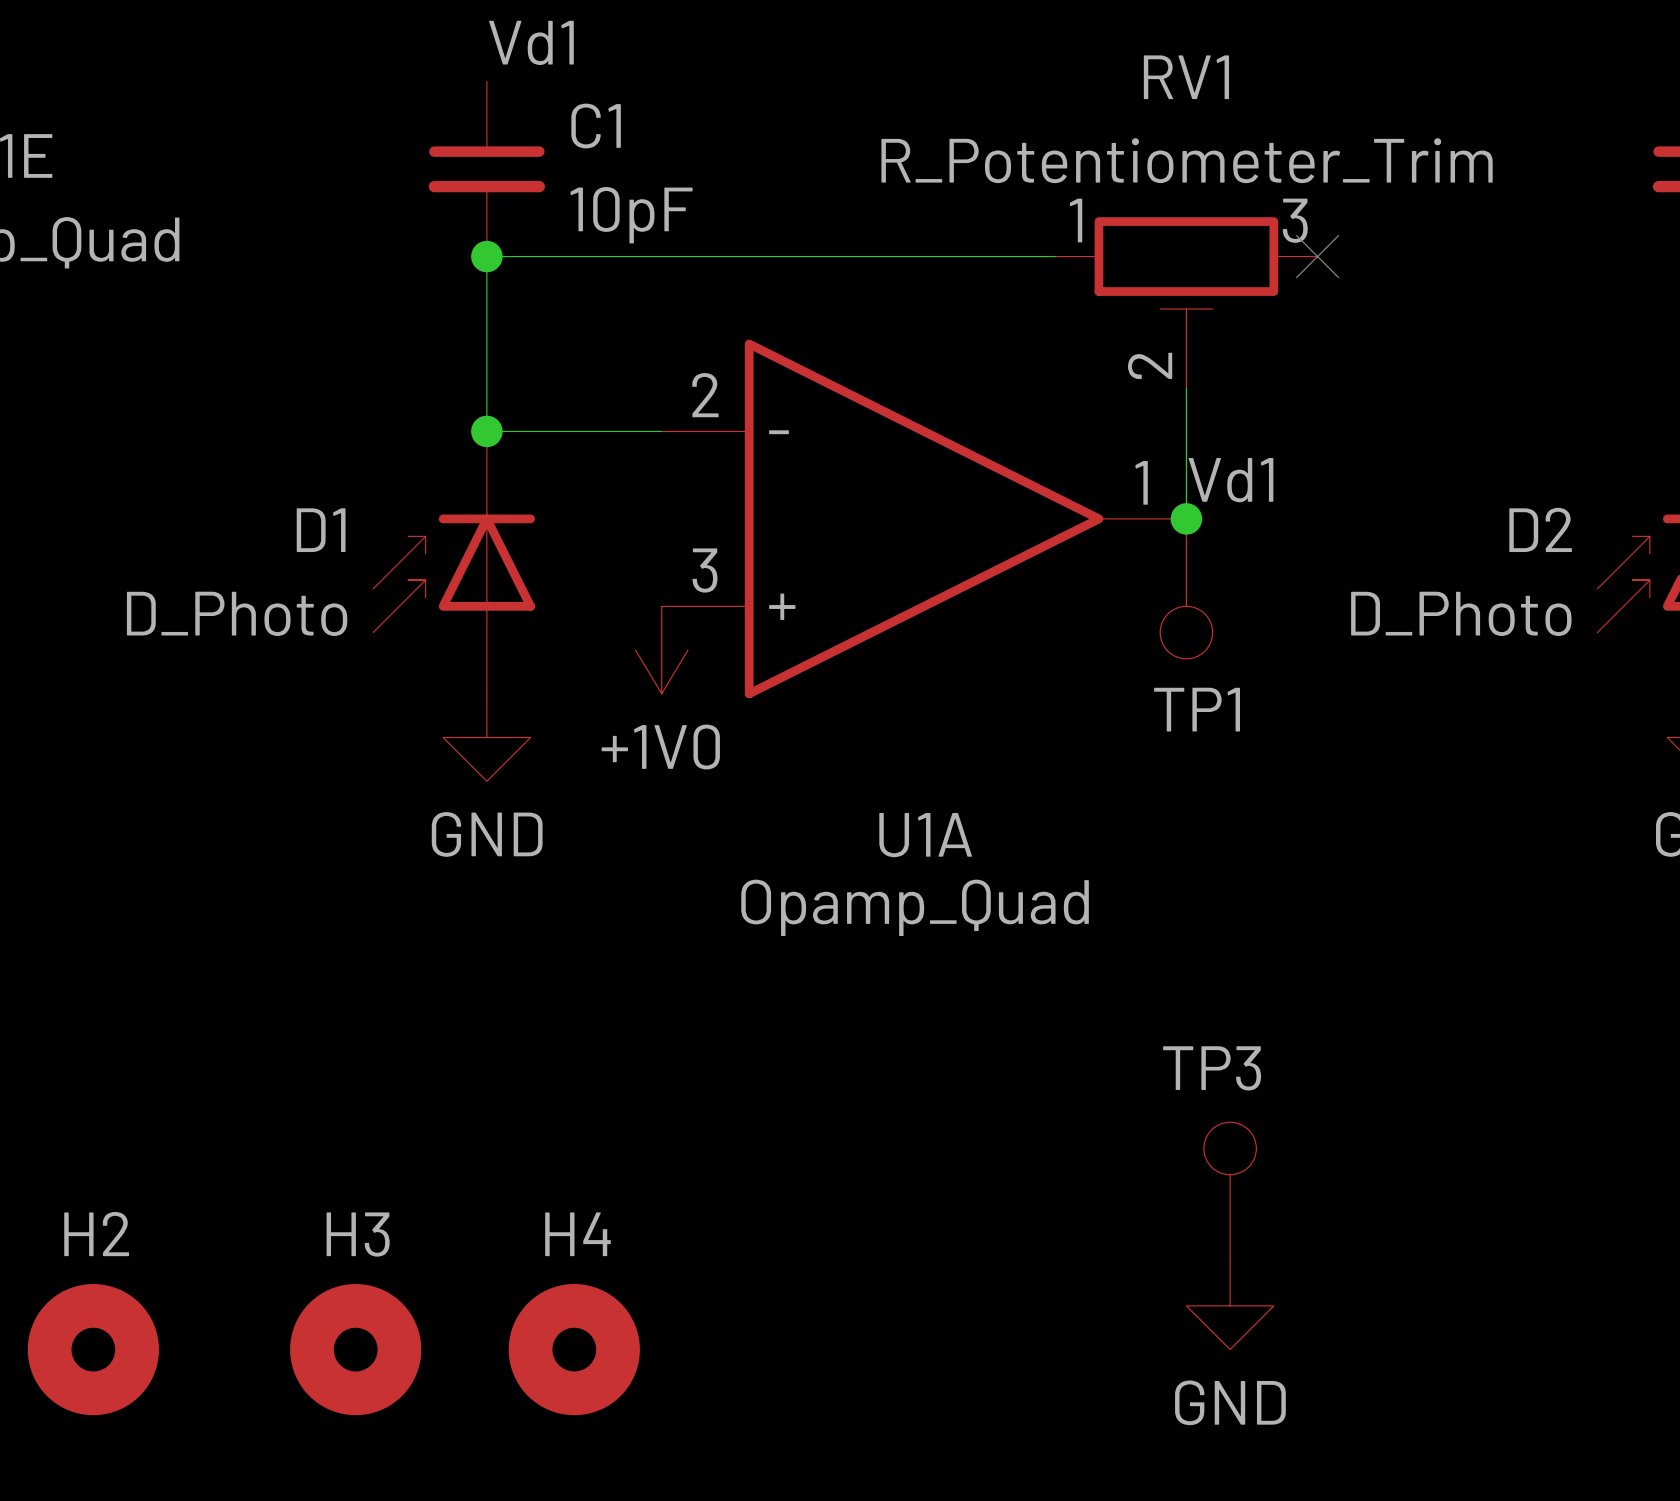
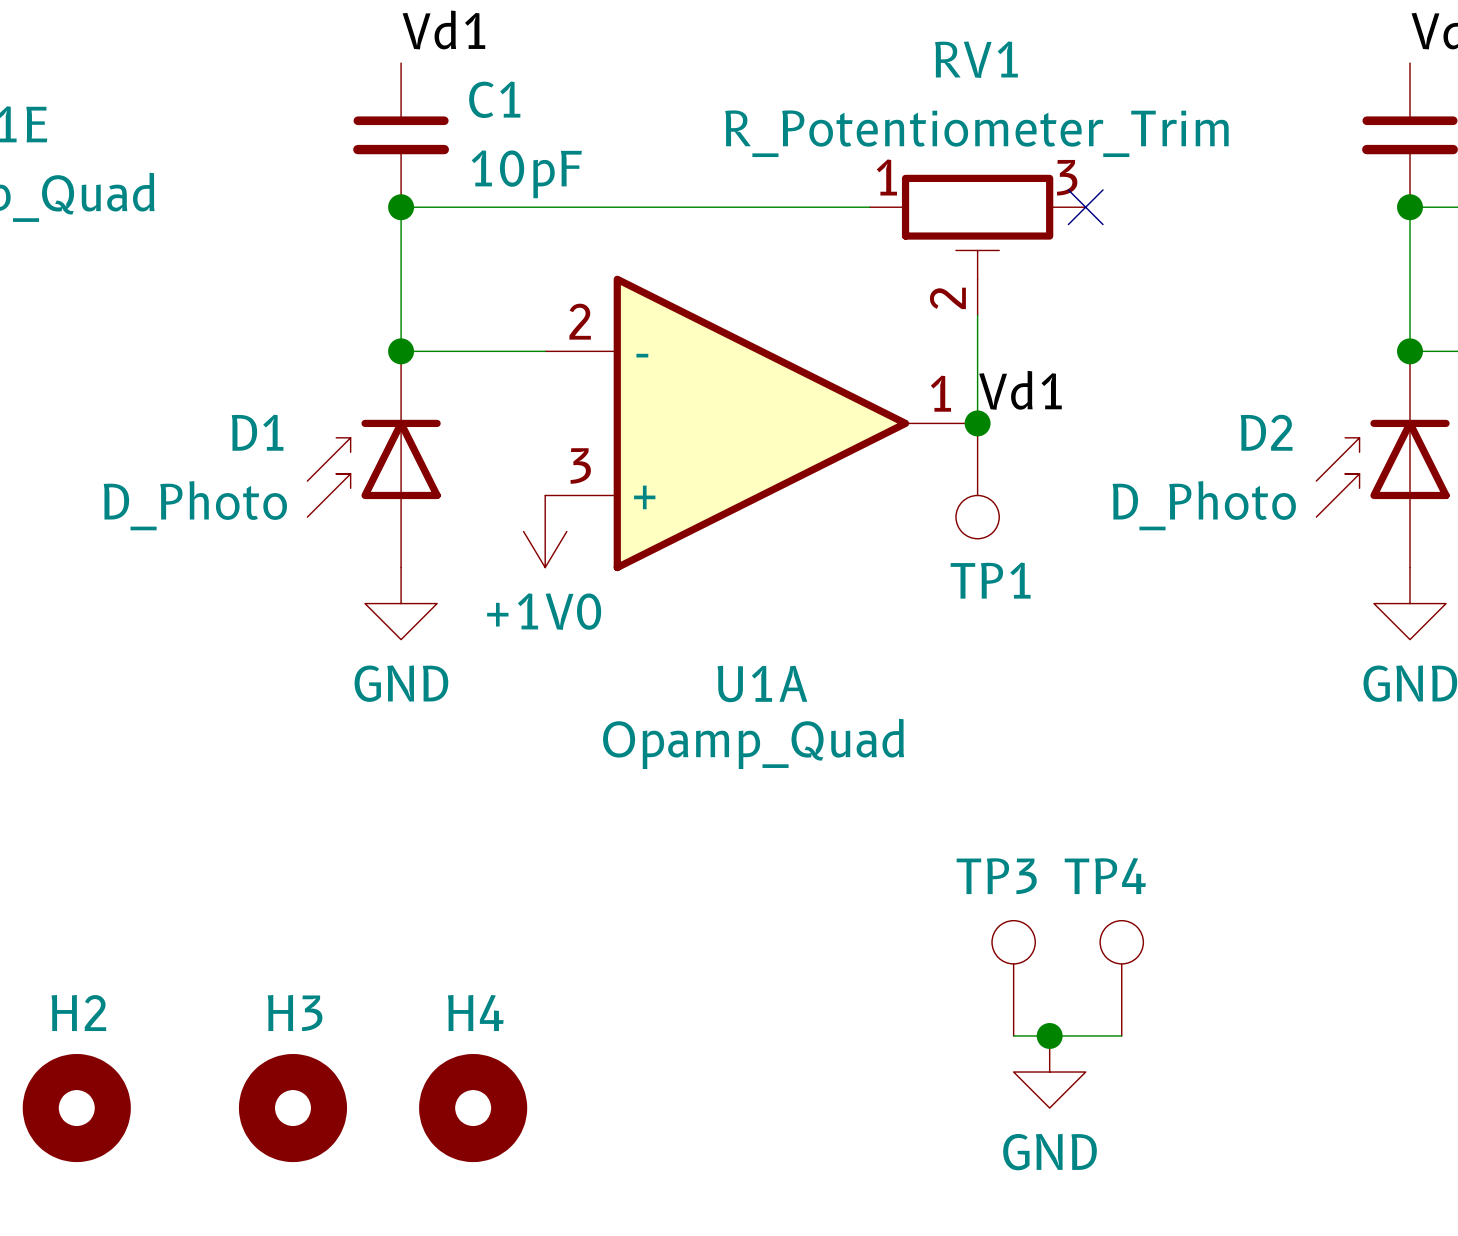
TP4: none -> (1121, 978)
wire: none -> (1013, 1035) (1121, 1035)
junction: none -> (1049, 1035)
power symbol position: GND (1230, 1305) -> GND (1049, 1072)

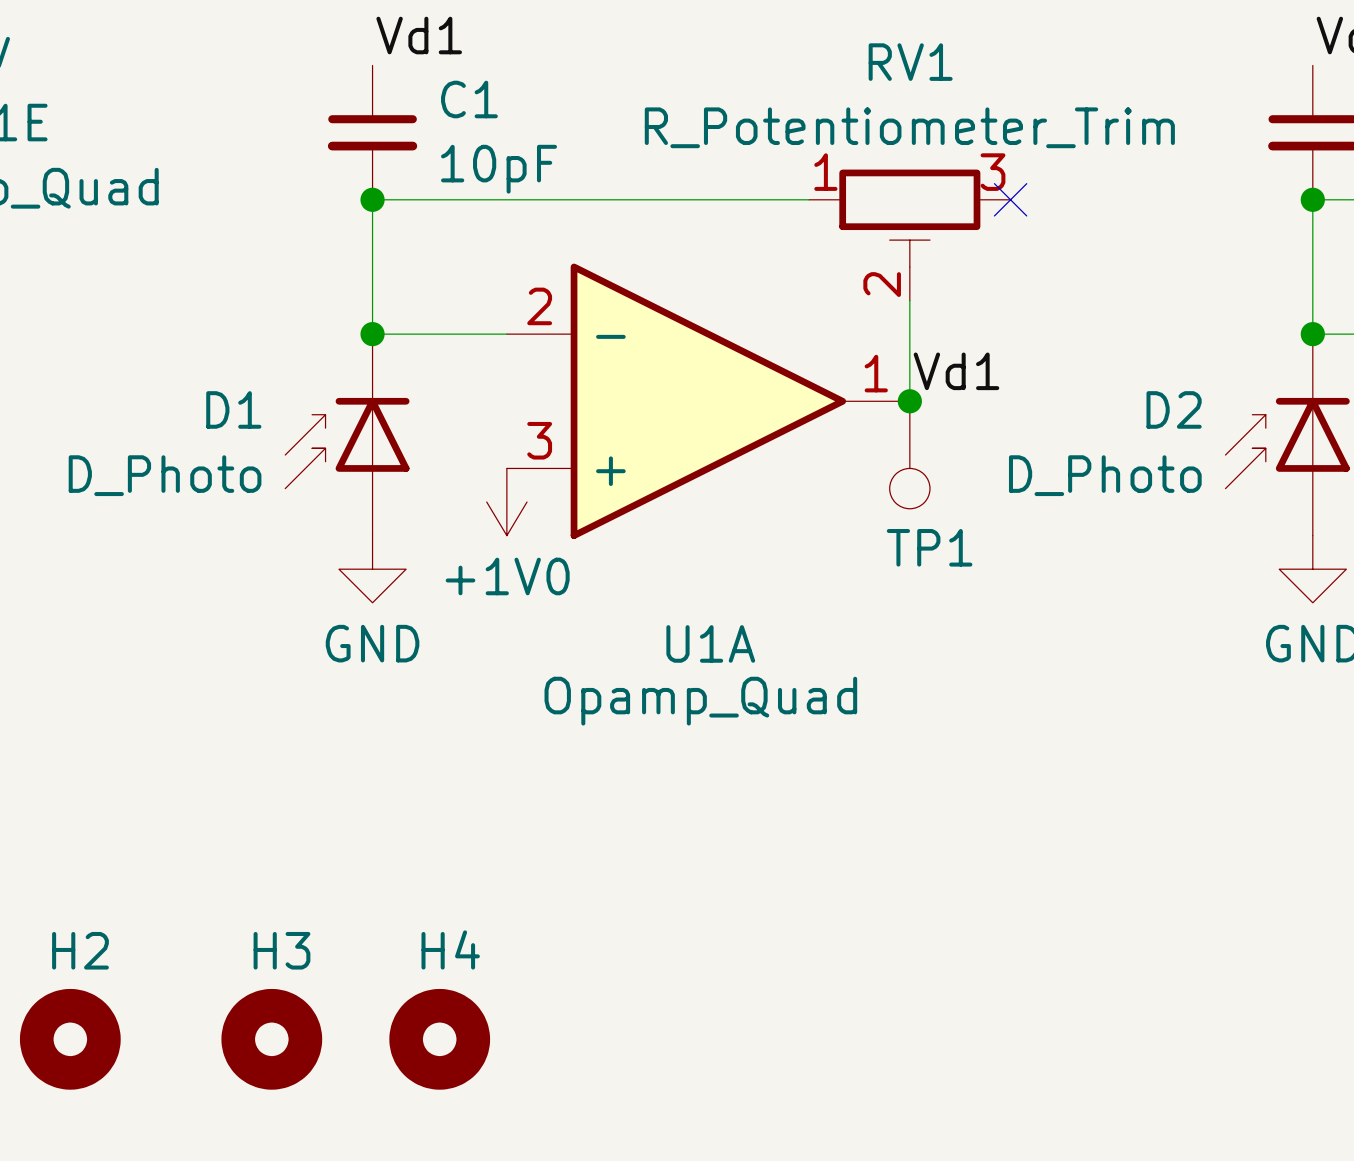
TP3: (1013, 978) -> none
TP4: (1121, 978) -> none
wire: (1013, 1035) (1121, 1035) -> none
junction: (1049, 1035) -> none
power symbol: GND (1049, 1072) -> none

